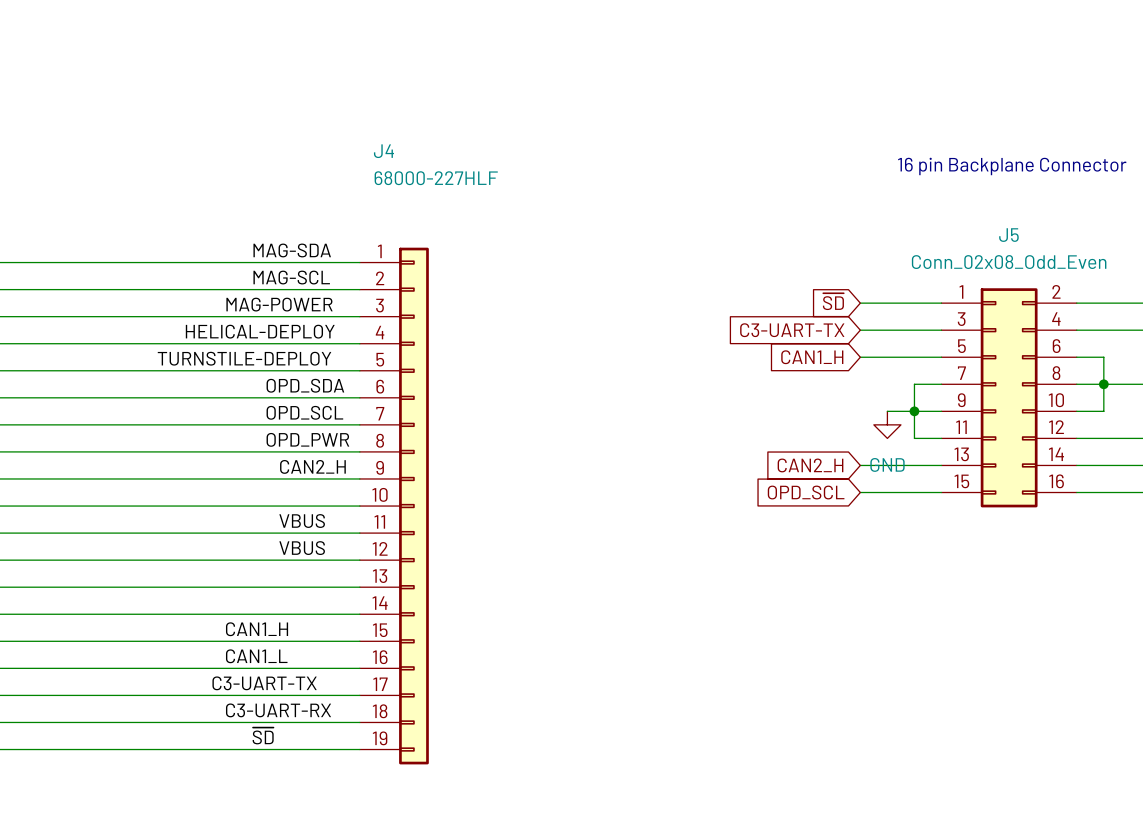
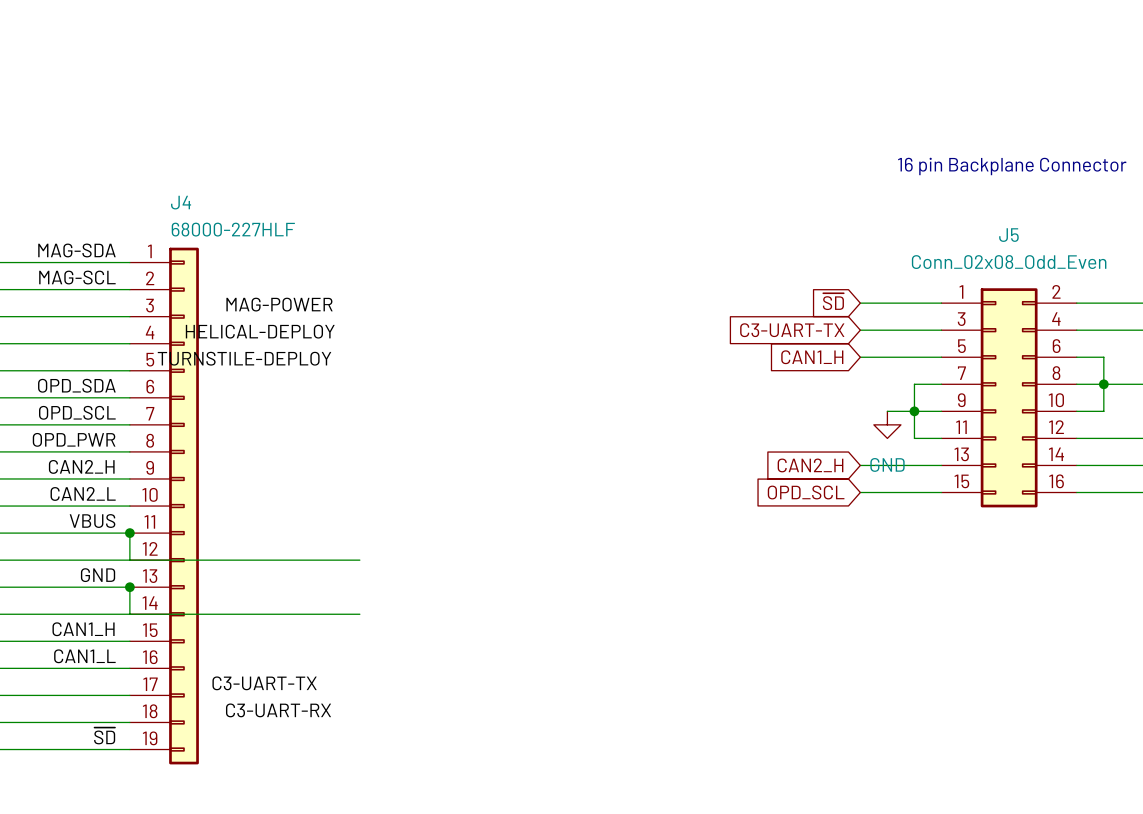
J4 name position: J4 (383, 151) -> J4 (181, 202)
J4 value position: 68000-227HLF (436, 178) -> 68000-227HLF (233, 229)
label position: MAG-SDA (292, 250) -> MAG-SDA (76, 250)
wire: (129, 262) (359, 262) -> none
label position: MAG-SCL (291, 277) -> MAG-SCL (77, 277)
wire: (129, 289) (359, 289) -> none
wire: (129, 316) (359, 316) -> none
wire: (129, 343) (359, 343) -> none
wire: (129, 370) (359, 370) -> none
label position: OPD_SDA (305, 385) -> OPD_SDA (76, 385)
wire: (129, 397) (359, 397) -> none
label position: OPD_SCL (304, 412) -> OPD_SCL (77, 412)
wire: (129, 424) (359, 424) -> none
label position: OPD_PWR (307, 439) -> OPD_PWR (74, 439)
wire: (129, 451) (359, 451) -> none
label position: CAN2_H (312, 466) -> CAN2_H (81, 466)
wire: (129, 478) (359, 478) -> none
label: none -> CAN2_L (83, 493)
wire: (129, 506) (359, 506) -> none
J4 position: (394, 506) -> (164, 506)
label: none -> VBUS (92, 521)
label: VBUS (302, 521) -> none
wire: (129, 533) (359, 533) -> (129, 533) (129, 560)
junction: none -> (129, 533)
label: VBUS (302, 548) -> none
label: none -> GND (98, 575)
wire: (129, 587) (359, 587) -> (129, 587) (129, 614)
junction: none -> (129, 587)
label position: CAN1_H (257, 629) -> CAN1_H (83, 629)
wire: (129, 641) (359, 641) -> none
label position: CAN1_L (256, 656) -> CAN1_L (84, 656)
wire: (129, 668) (359, 668) -> none
wire: (129, 695) (359, 695) -> none
wire: (129, 722) (359, 722) -> none
label position: ~{SD} (263, 735) -> ~{SD} (104, 735)
wire: (129, 749) (359, 749) -> none

